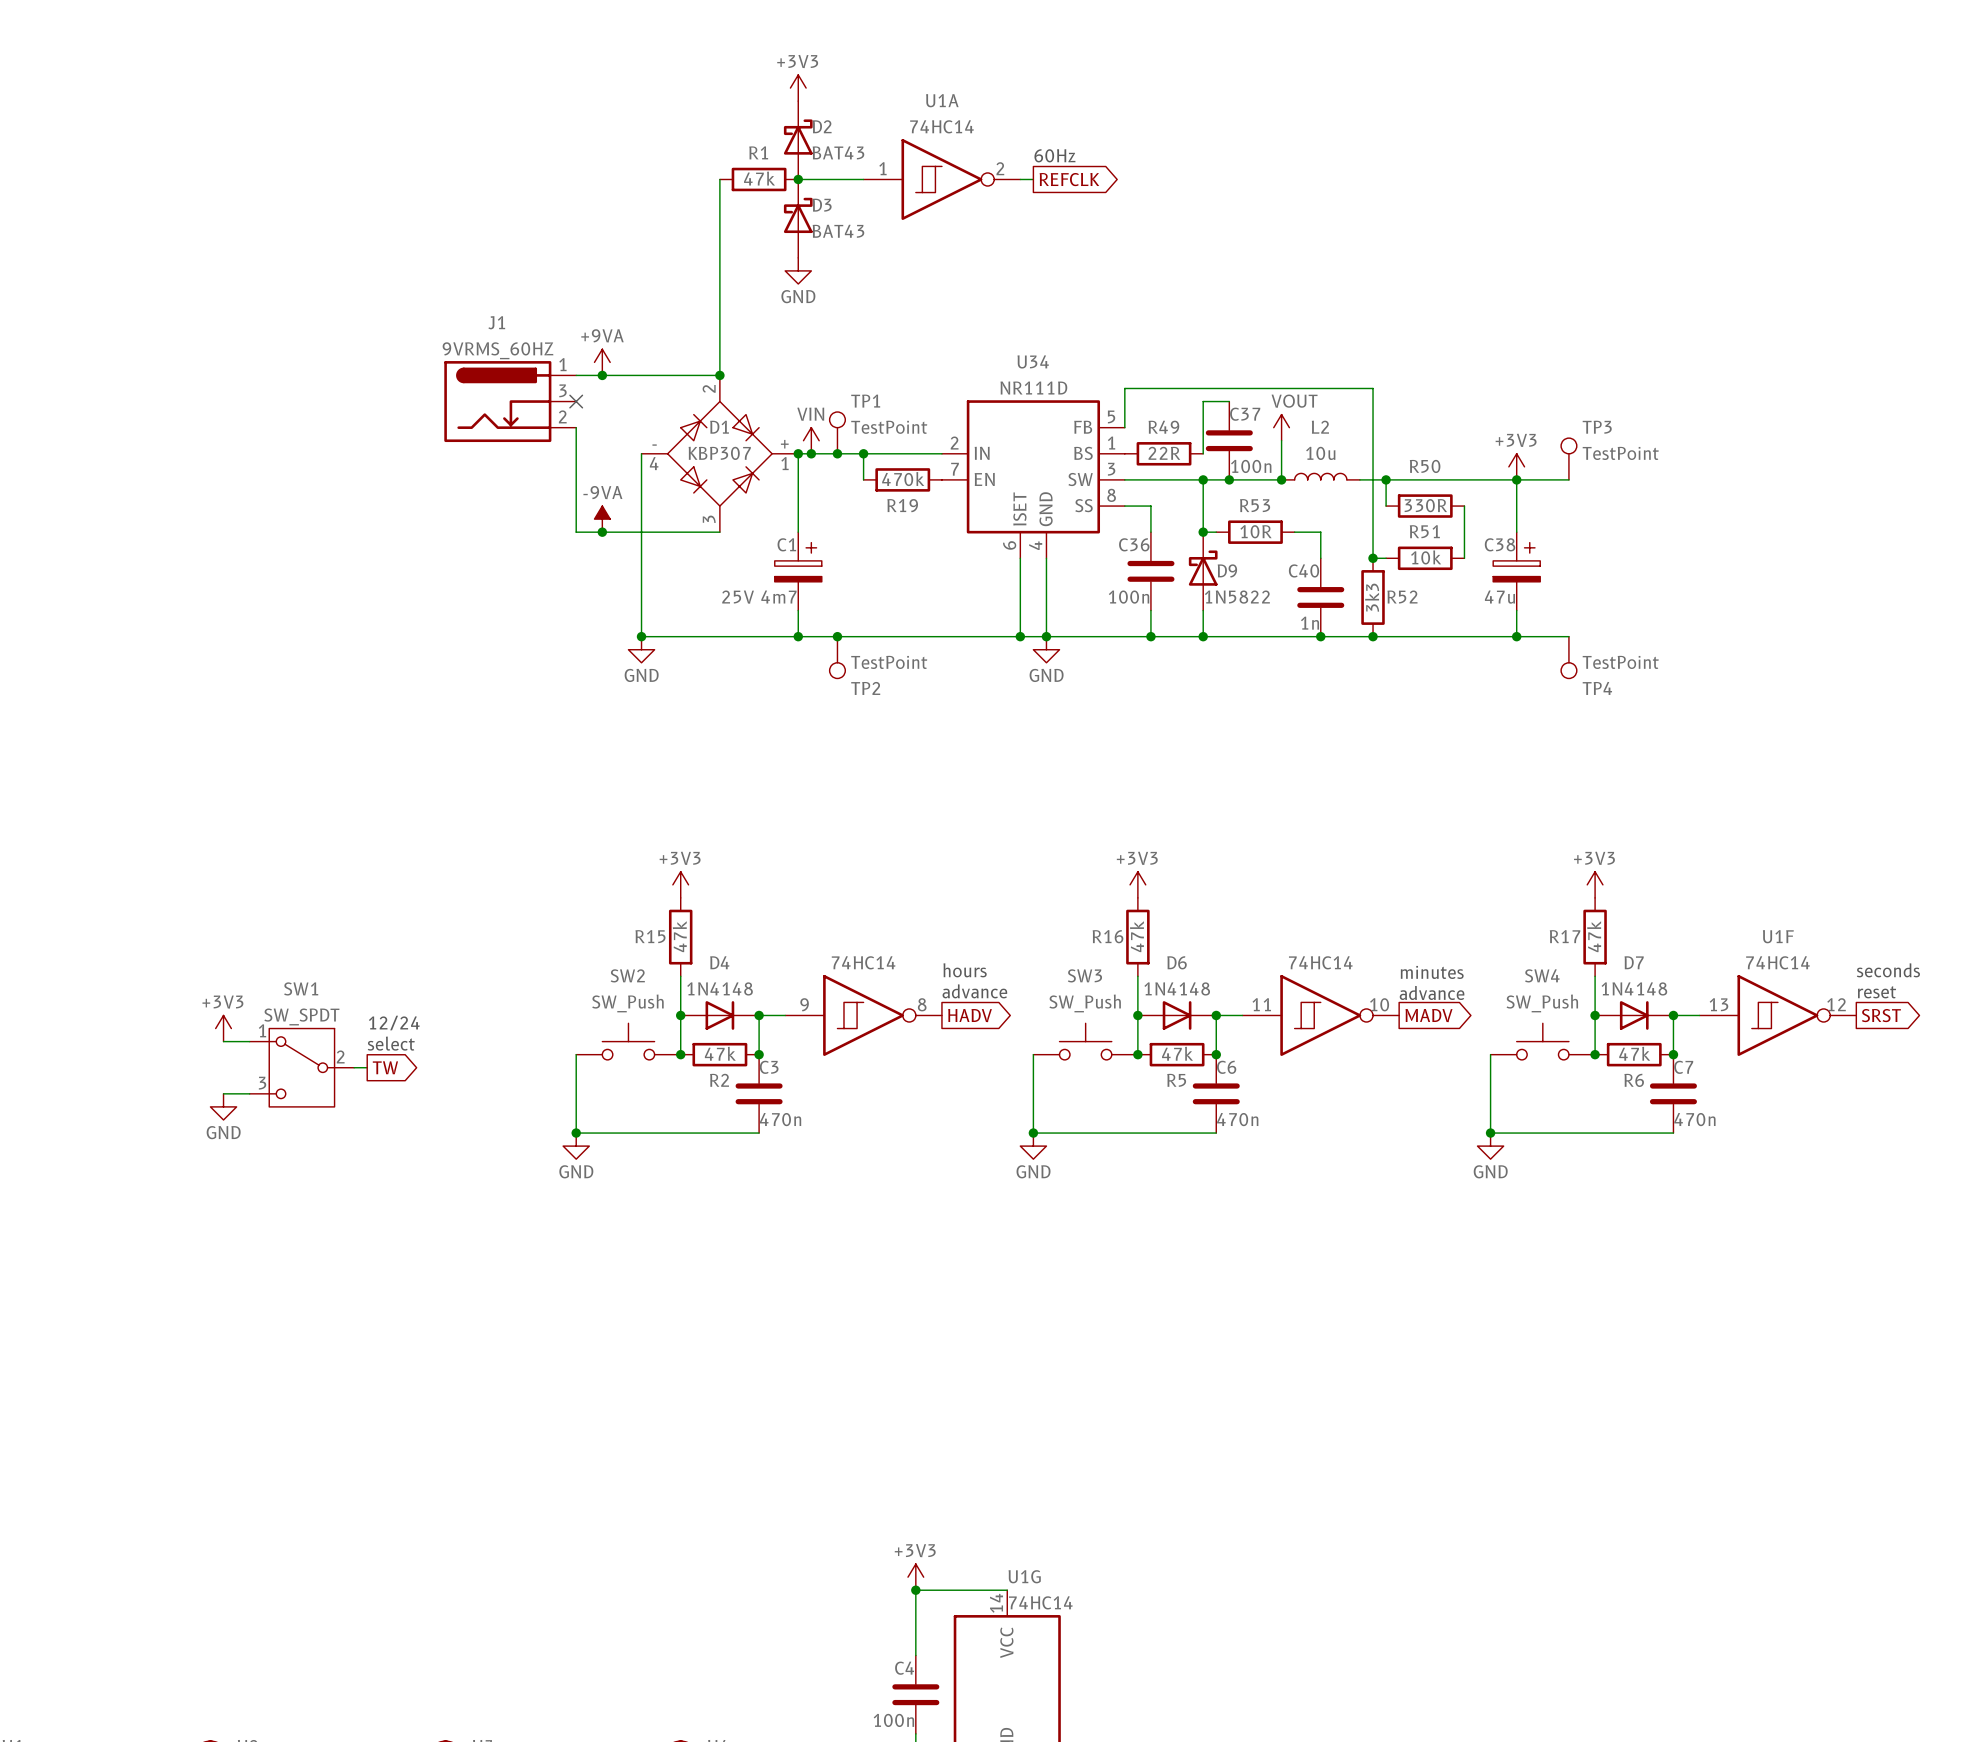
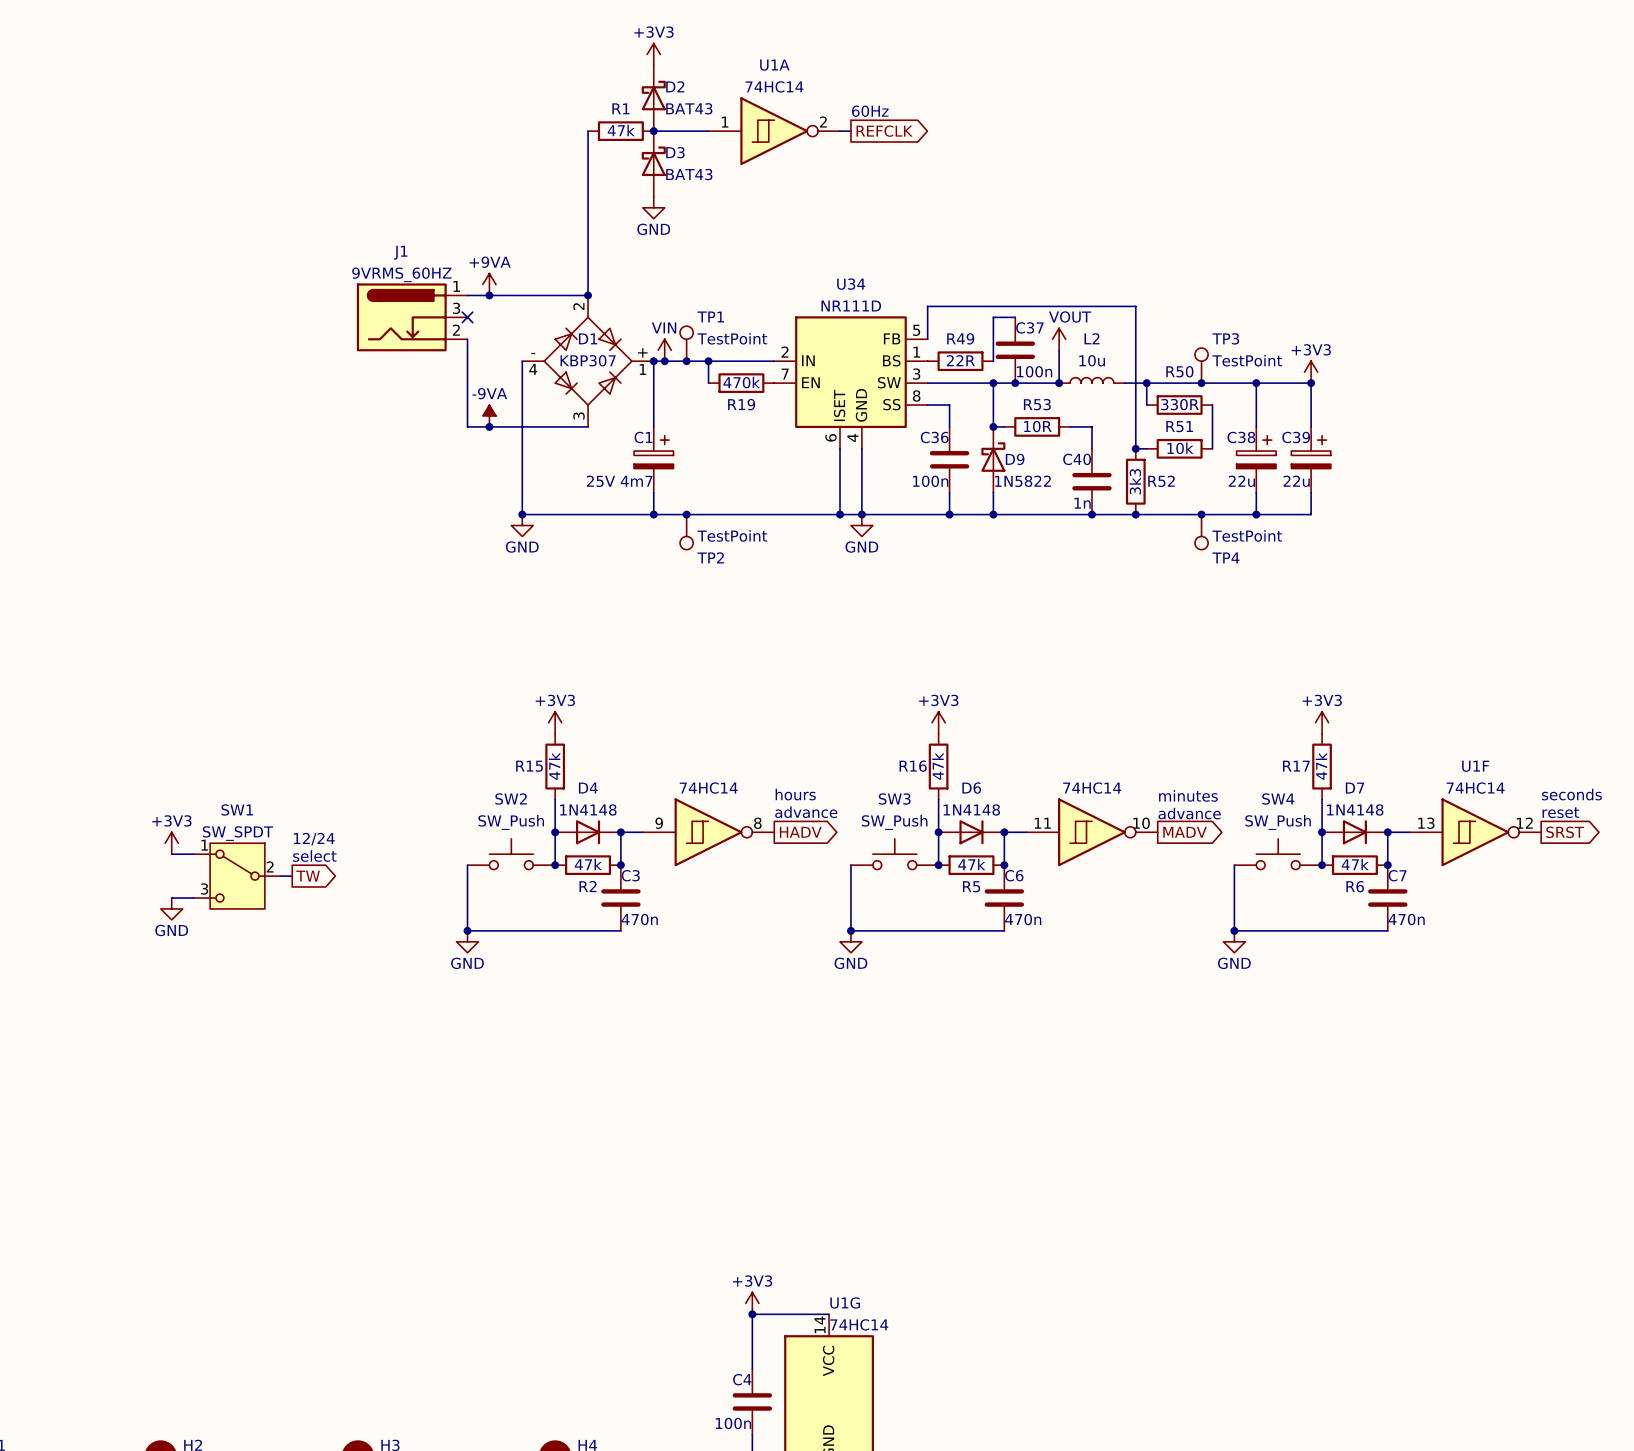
TP3 position: (1568, 459) -> (1201, 365)
power symbol position: +3V3 (1516, 466) -> +3V3 (1311, 372)
junction: none -> (1201, 383)
wire: none -> (1300, 383) (1311, 383) (1311, 426)
junction: none -> (1311, 383)
C39: none -> 22u (1311, 459)
C38 value: 47u (1499, 597) -> 22u (1241, 481)
wire: none -> (1311, 492) (1311, 514) (1300, 514)
junction: none -> (1201, 514)
TP4 position: (1568, 657) -> (1201, 532)

